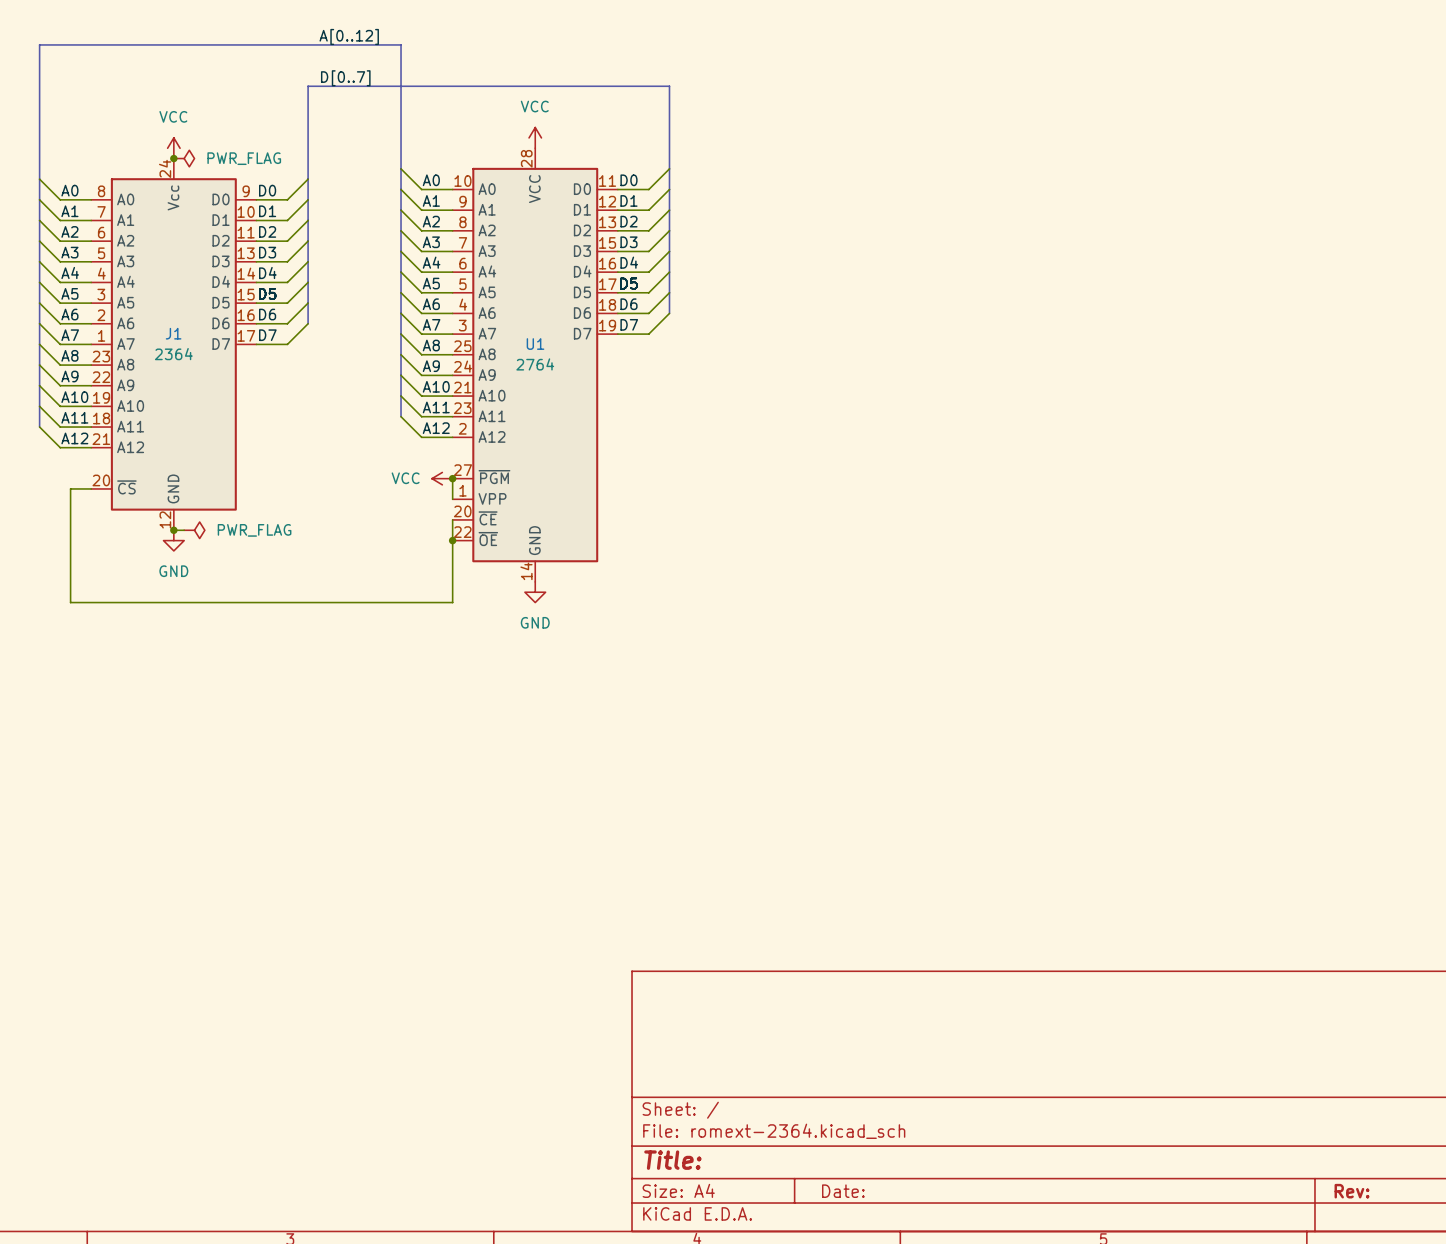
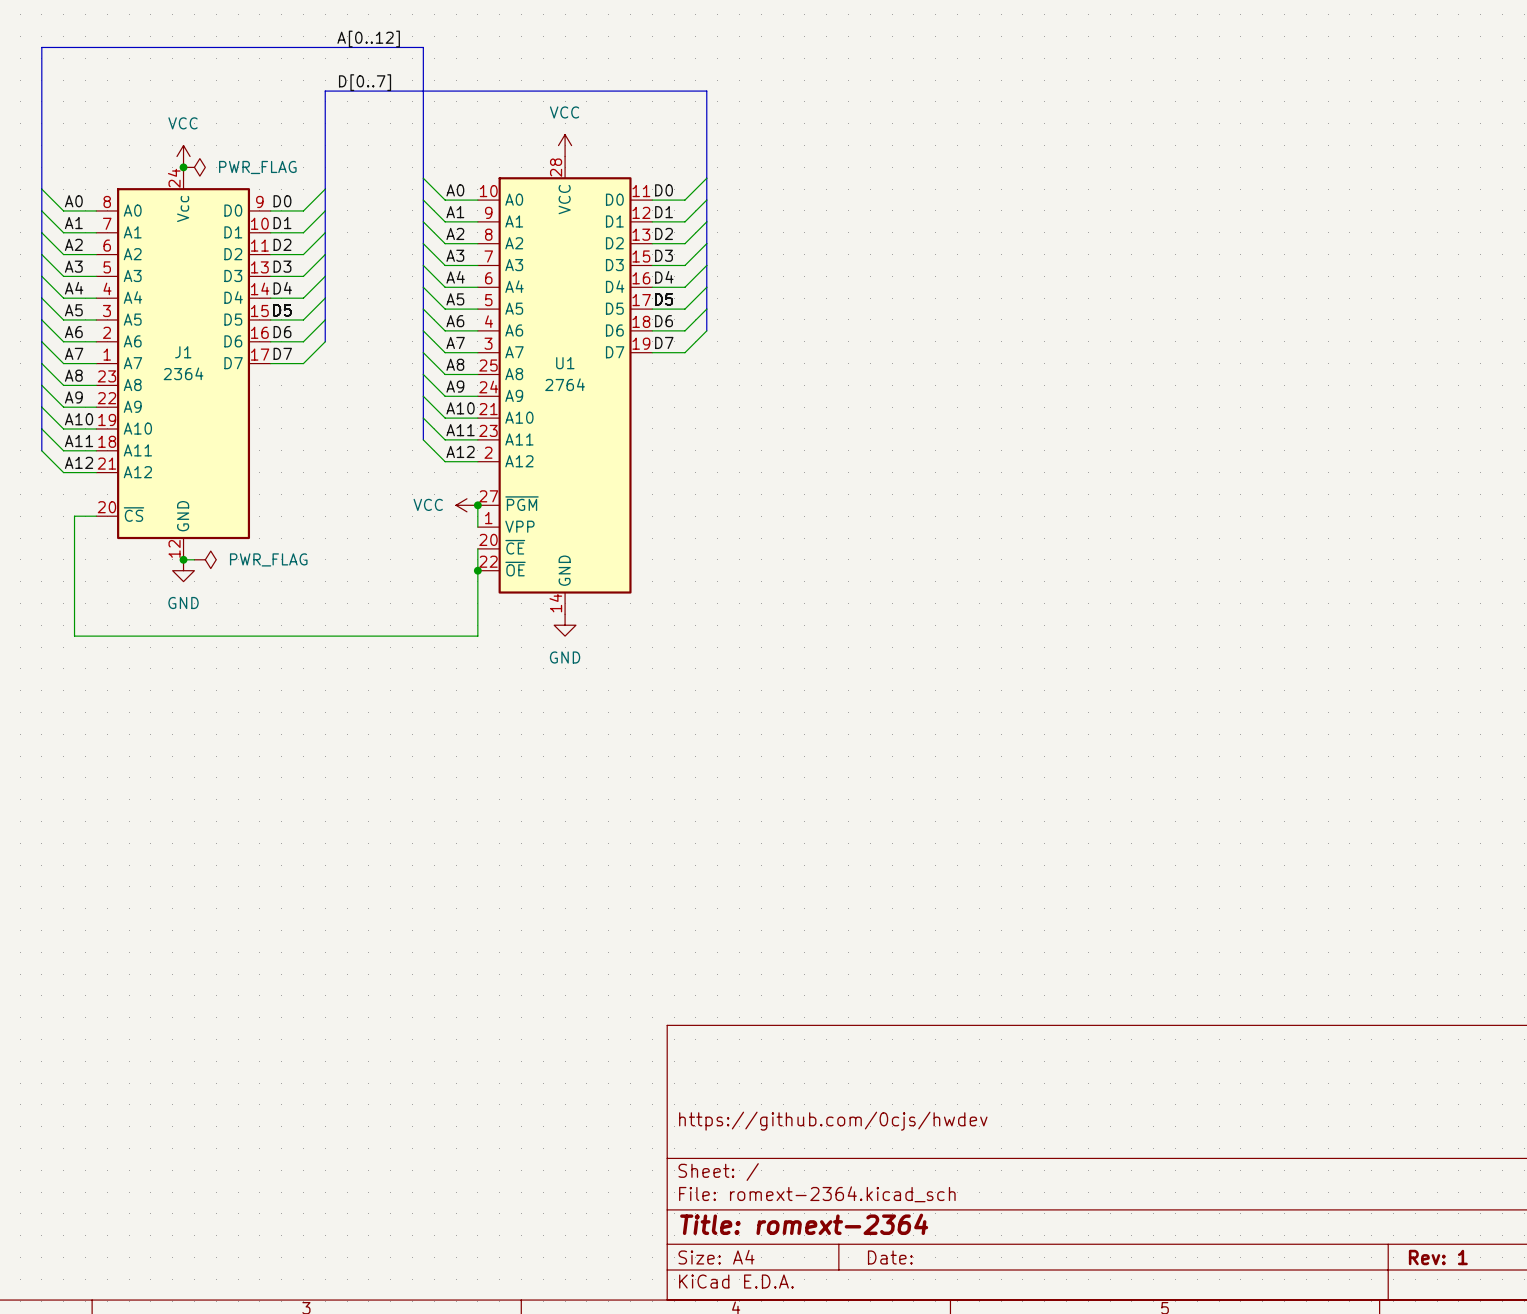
title block: none -> https://github.com/0cjs/hwdev (833, 1121)
title block: Title: (672, 1160) -> Title: romext-2364 (804, 1224)
title block: Rev: (1352, 1191) -> Rev: 1 (1438, 1257)

